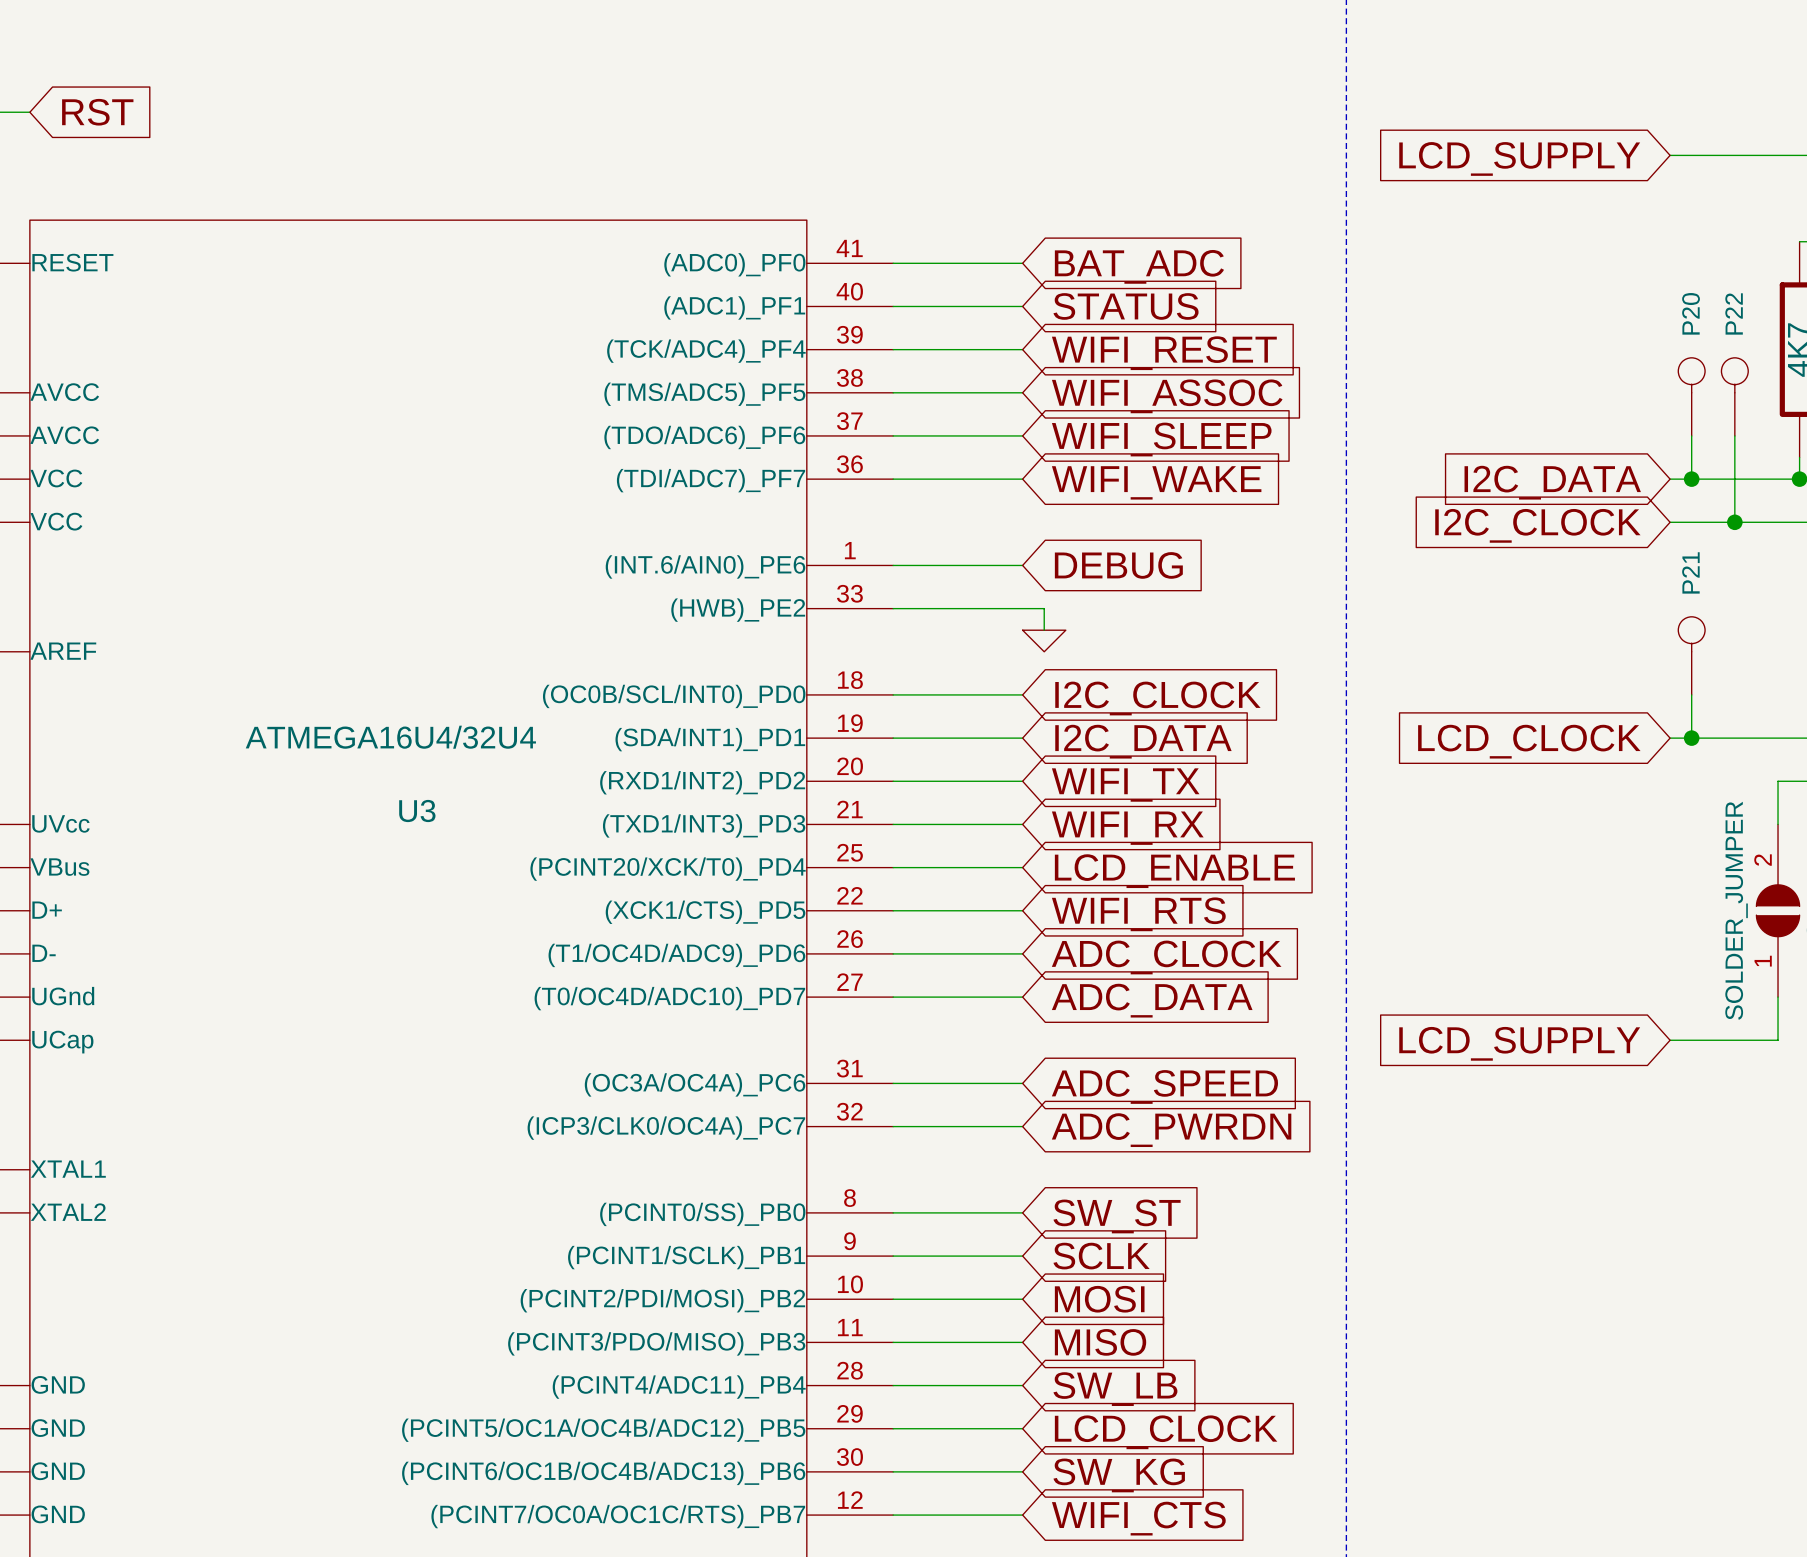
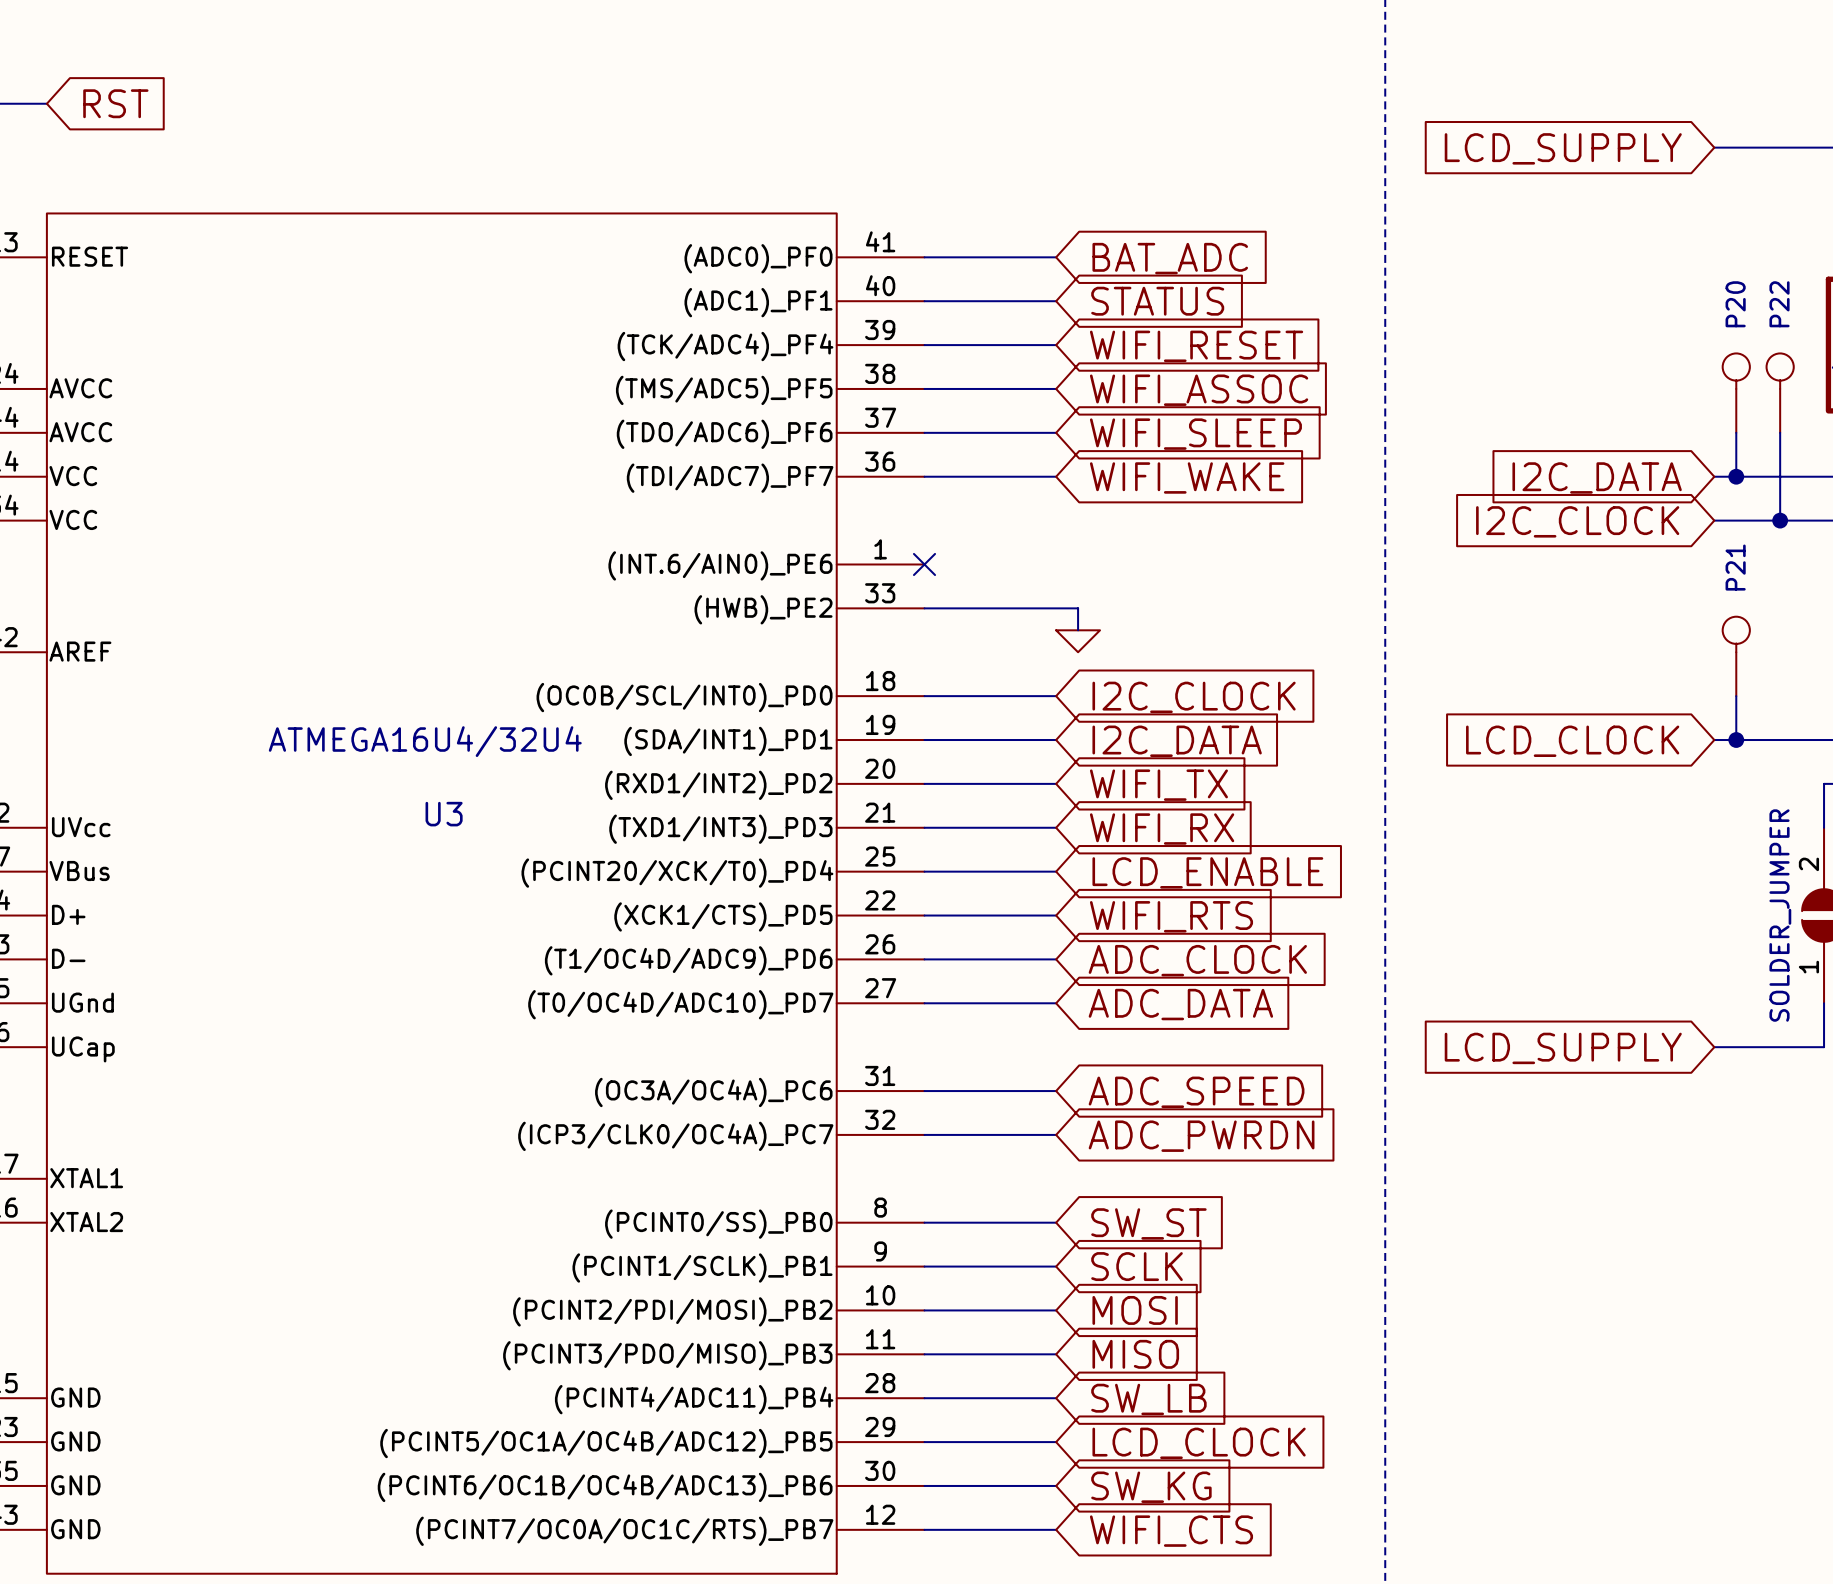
wire: (893, 565) (1022, 565) -> none
no-connect mark: none -> (924, 564)
global label: DEBUG (1118, 565) -> none

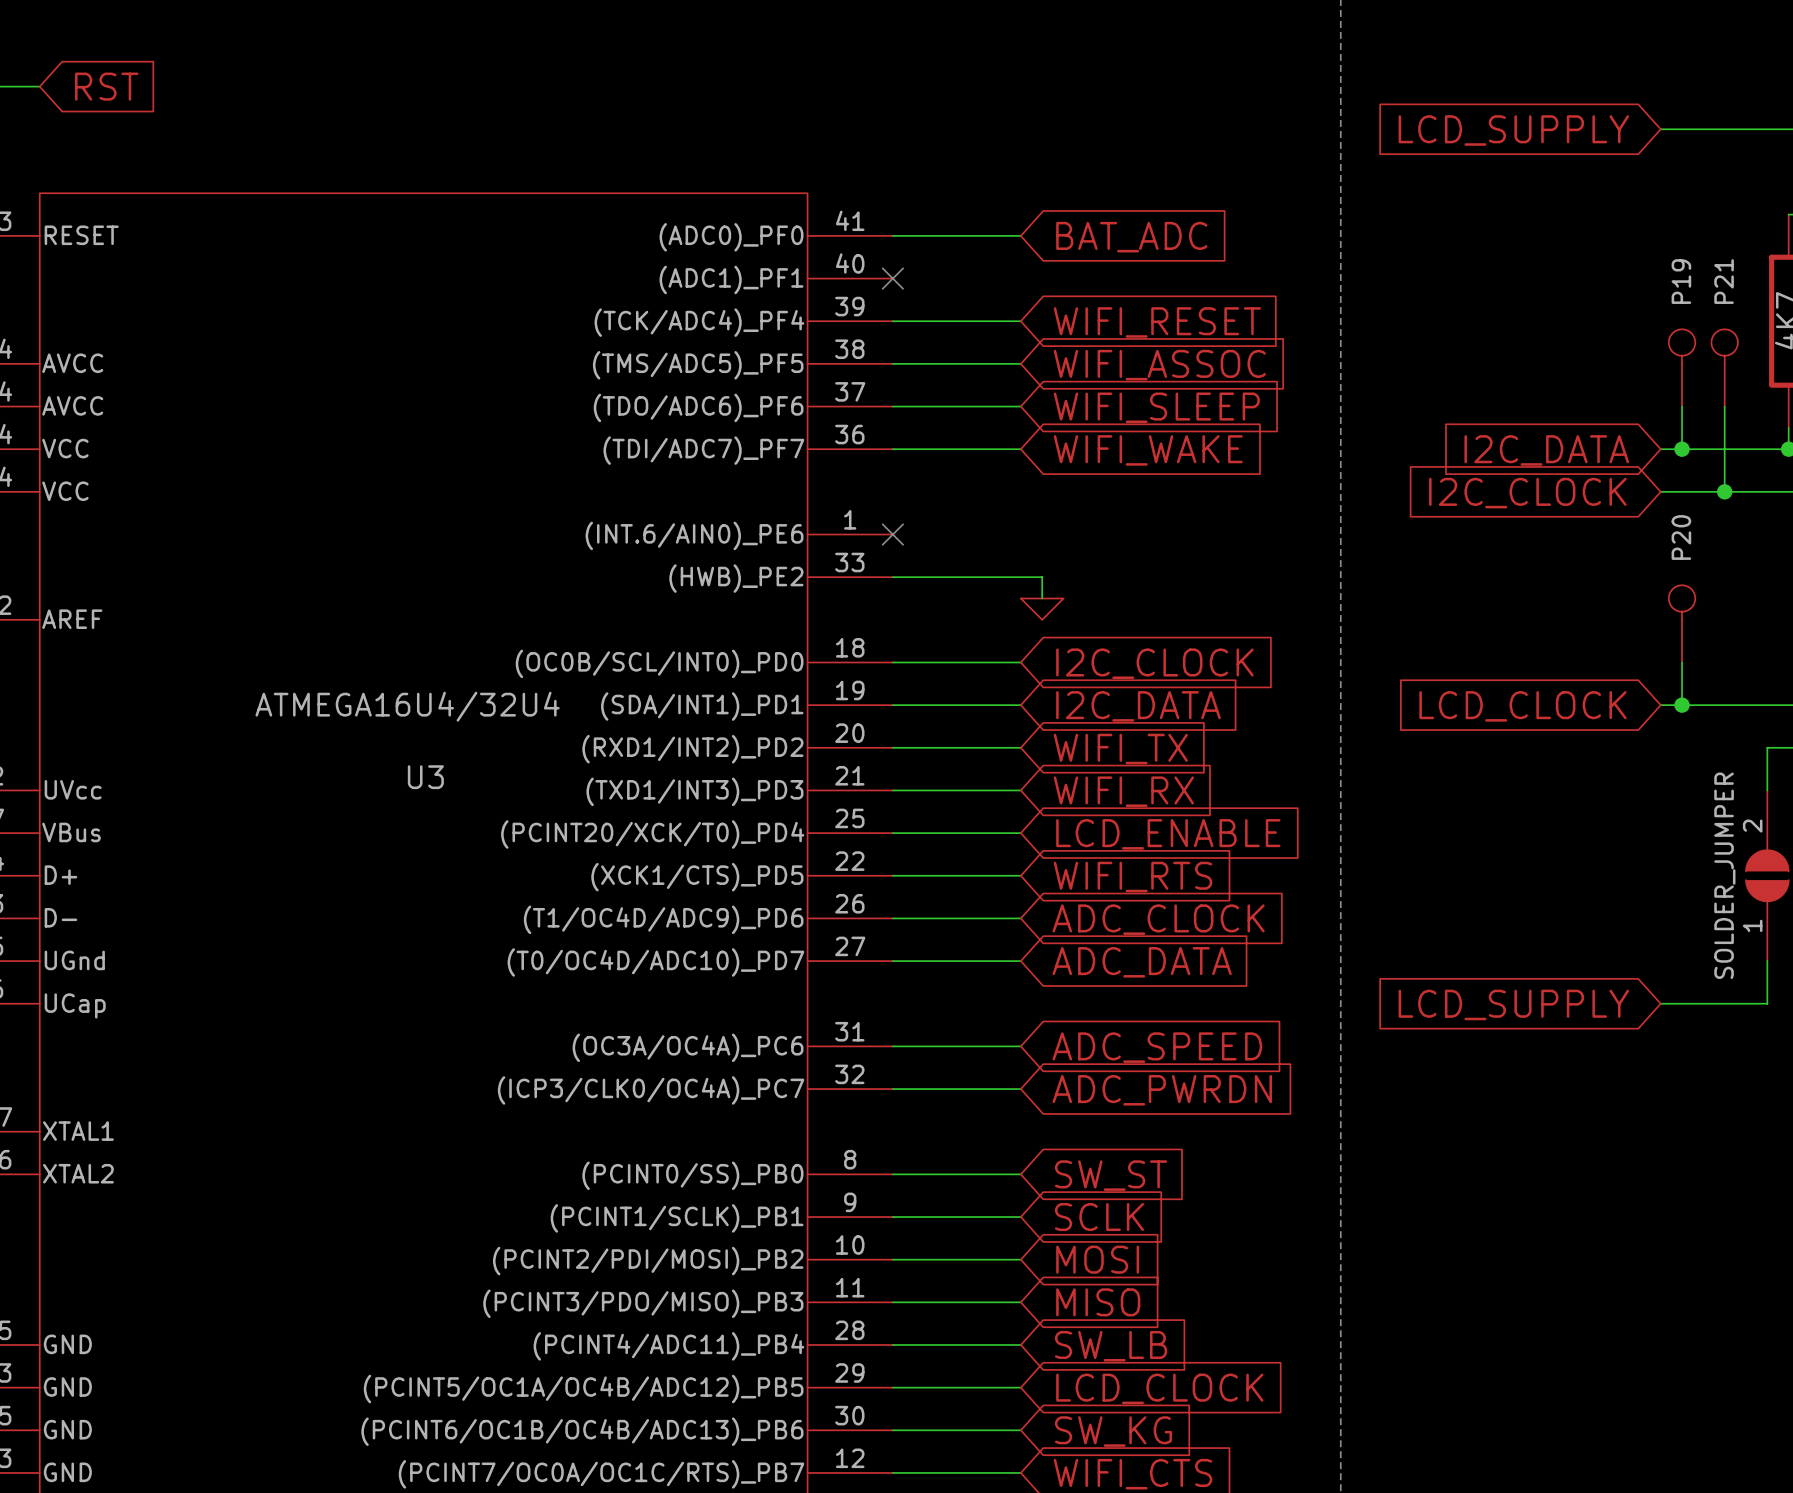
wire: (924, 301) (1056, 301) -> none
no-connect mark: none -> (892, 278)
global label: STATUS (1157, 301) -> none
P20 name: P20 (1735, 304) -> P19 (1681, 281)
P22 name: P22 (1779, 304) -> P21 (1724, 281)
P21 name: P21 (1735, 567) -> P20 (1681, 537)

